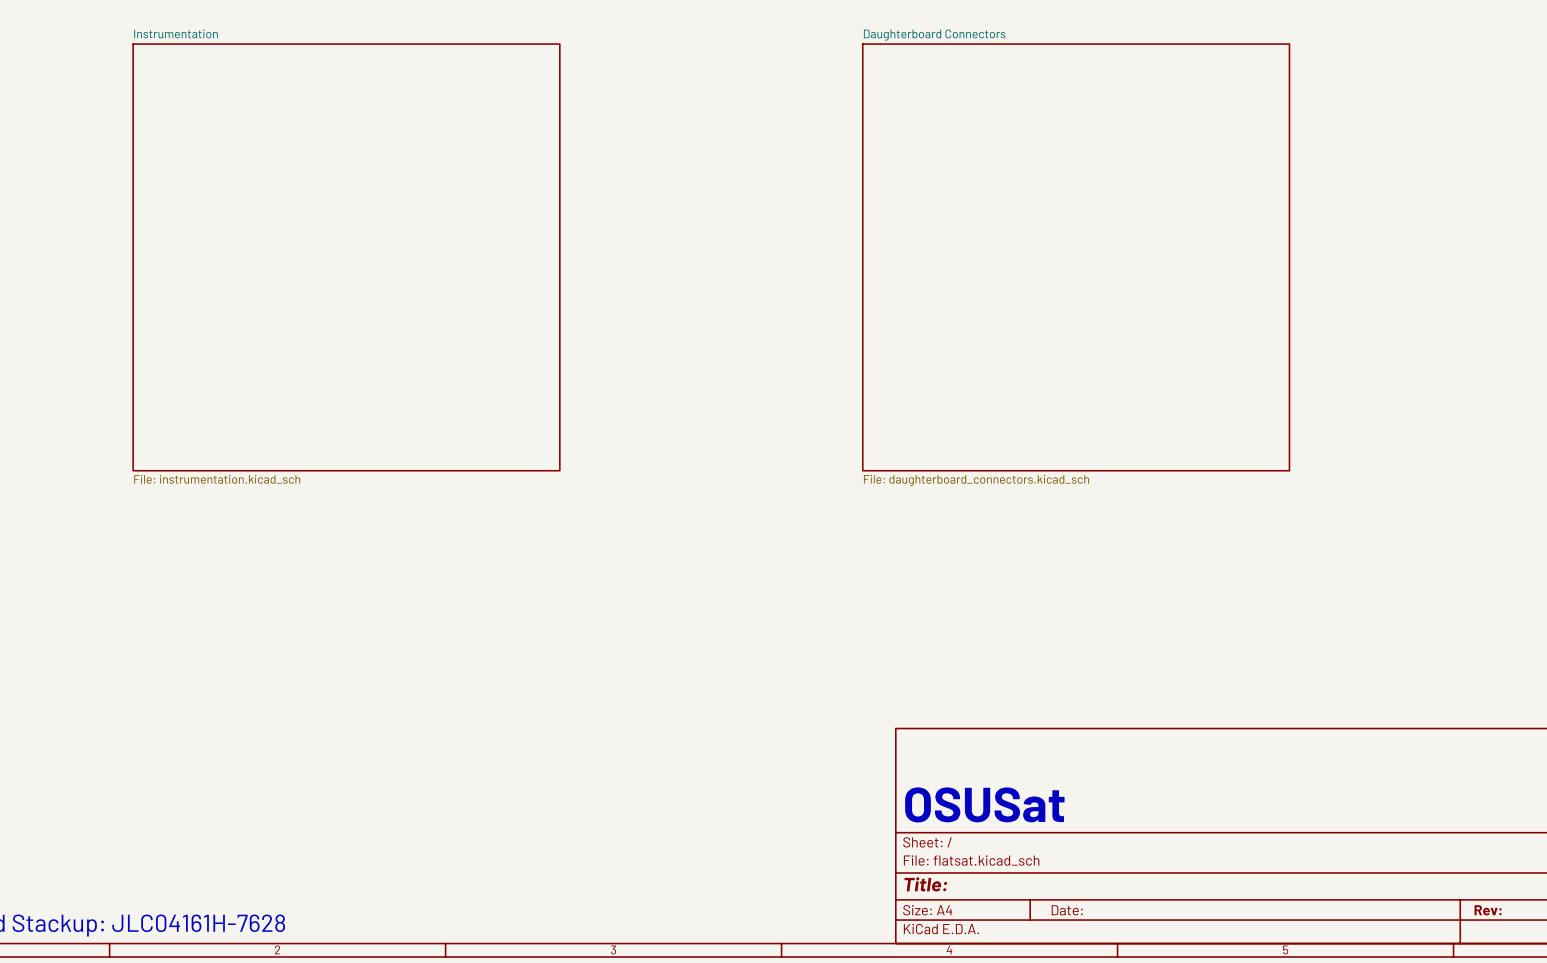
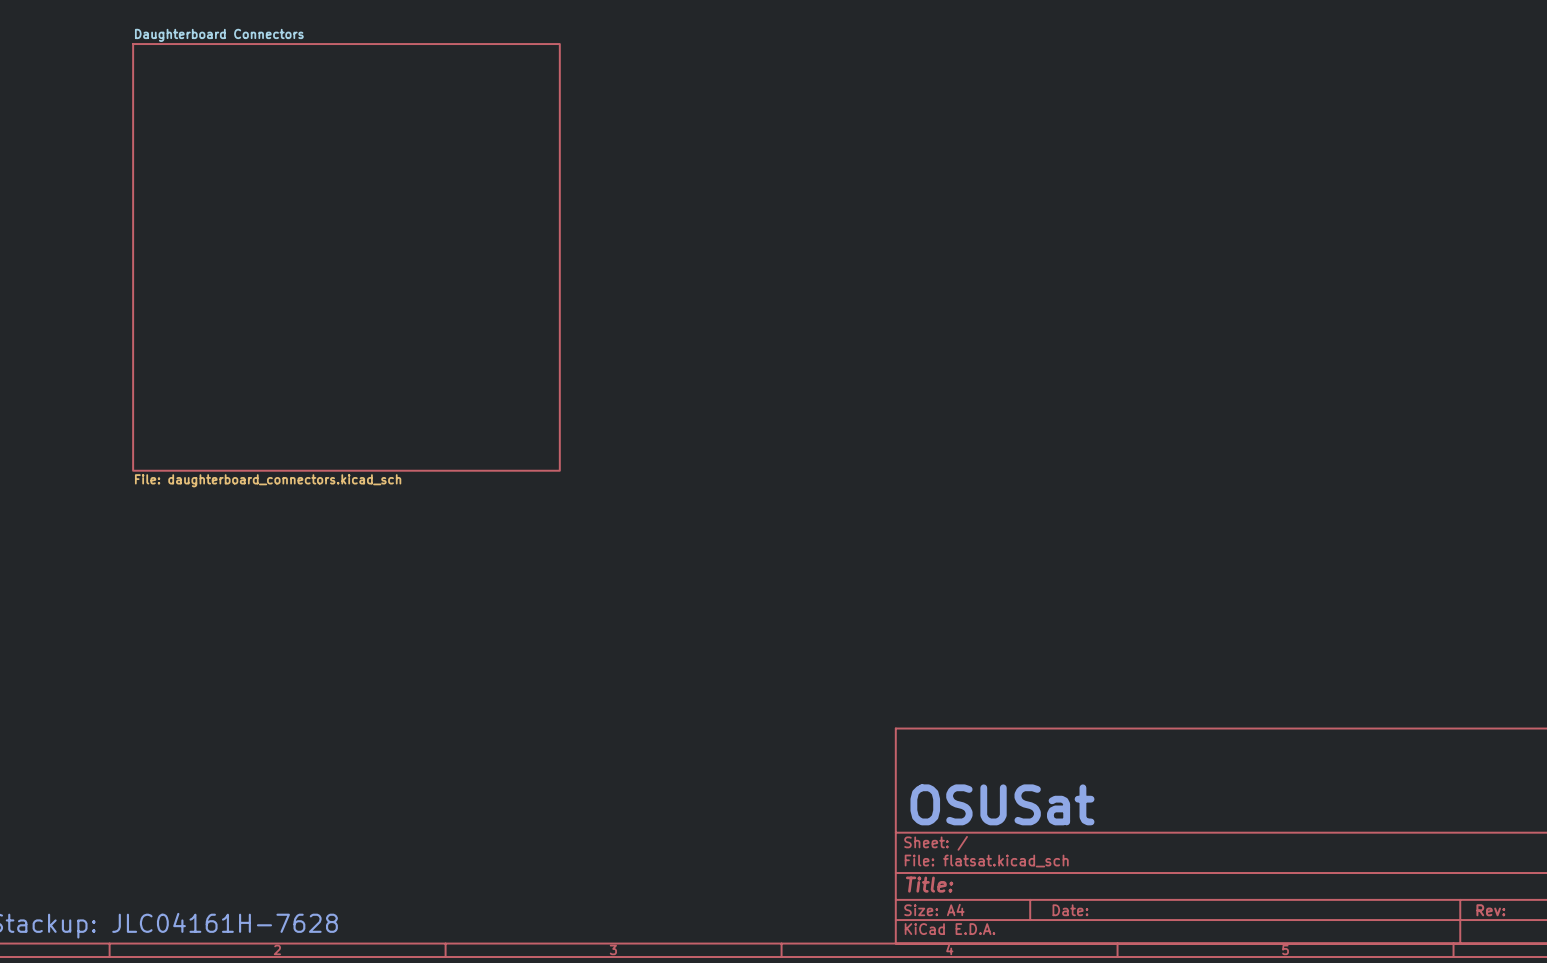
sheet Instrumentation name: Instrumentation (176, 33) -> Daughterboard Connectors (219, 35)
sheet Daughterboard Connectors: File: daughterboard_connectors.kicad_sch (1076, 257) -> none
sheet Instrumentation value: File: instrumentation.kicad_sch (217, 479) -> File: daughterboard_connectors.kicad_sch (268, 480)

